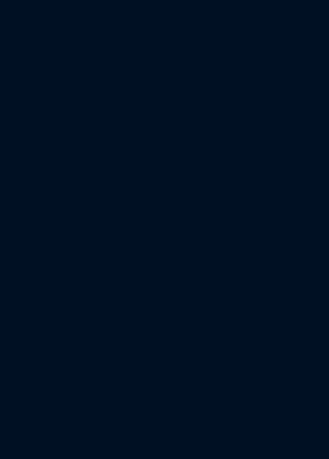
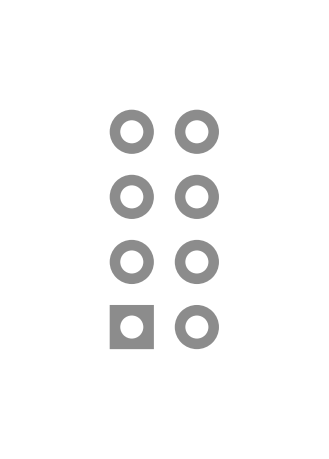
part: none -> (164, 229)

